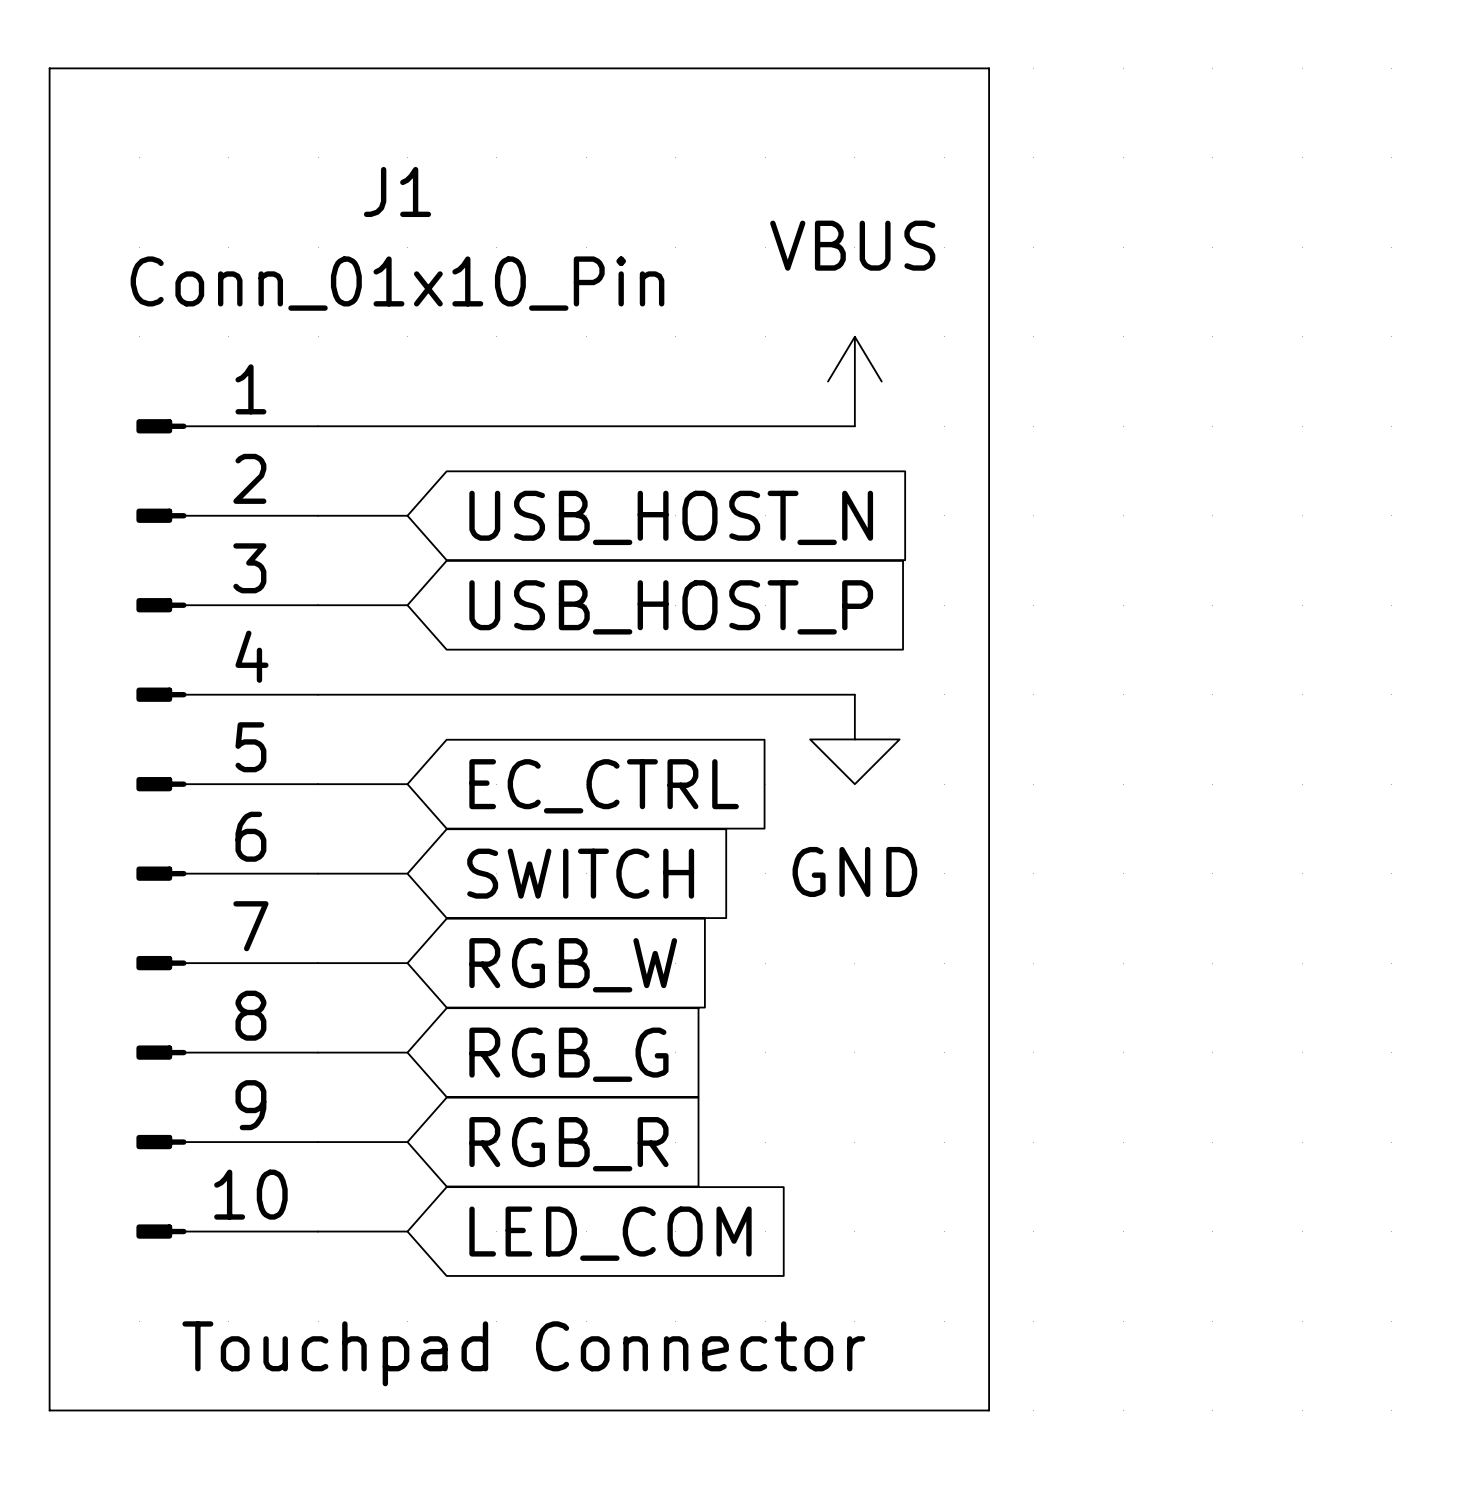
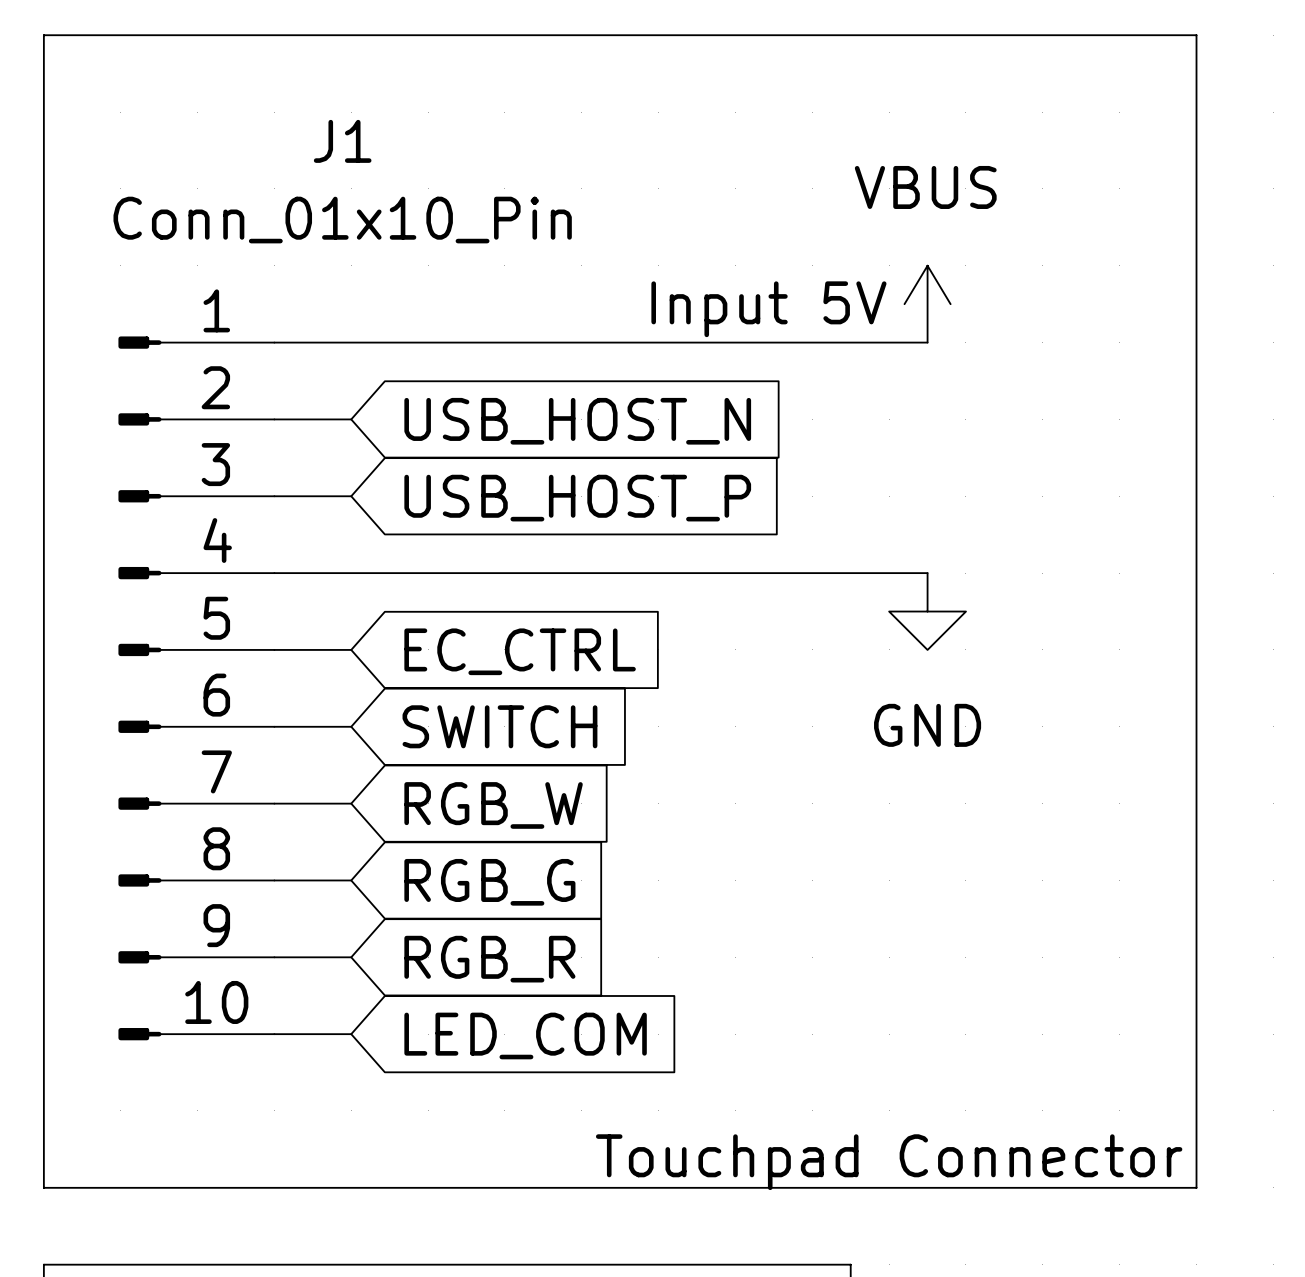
line: (989, 68) (989, 1410) -> (850, 35) (1196, 35) (1196, 1187) (850, 1187)
power symbol position: VBUS (854, 381) -> VBUS (927, 304)
text: none -> Input 5V (768, 309)
wire: none -> (735, 342) (927, 342)
wire: none -> (735, 573) (927, 573)
power symbol position: GND (854, 739) -> GND (927, 611)
text position: Touchpad Connector (523, 1353) -> Touchpad Connector (889, 1162)

